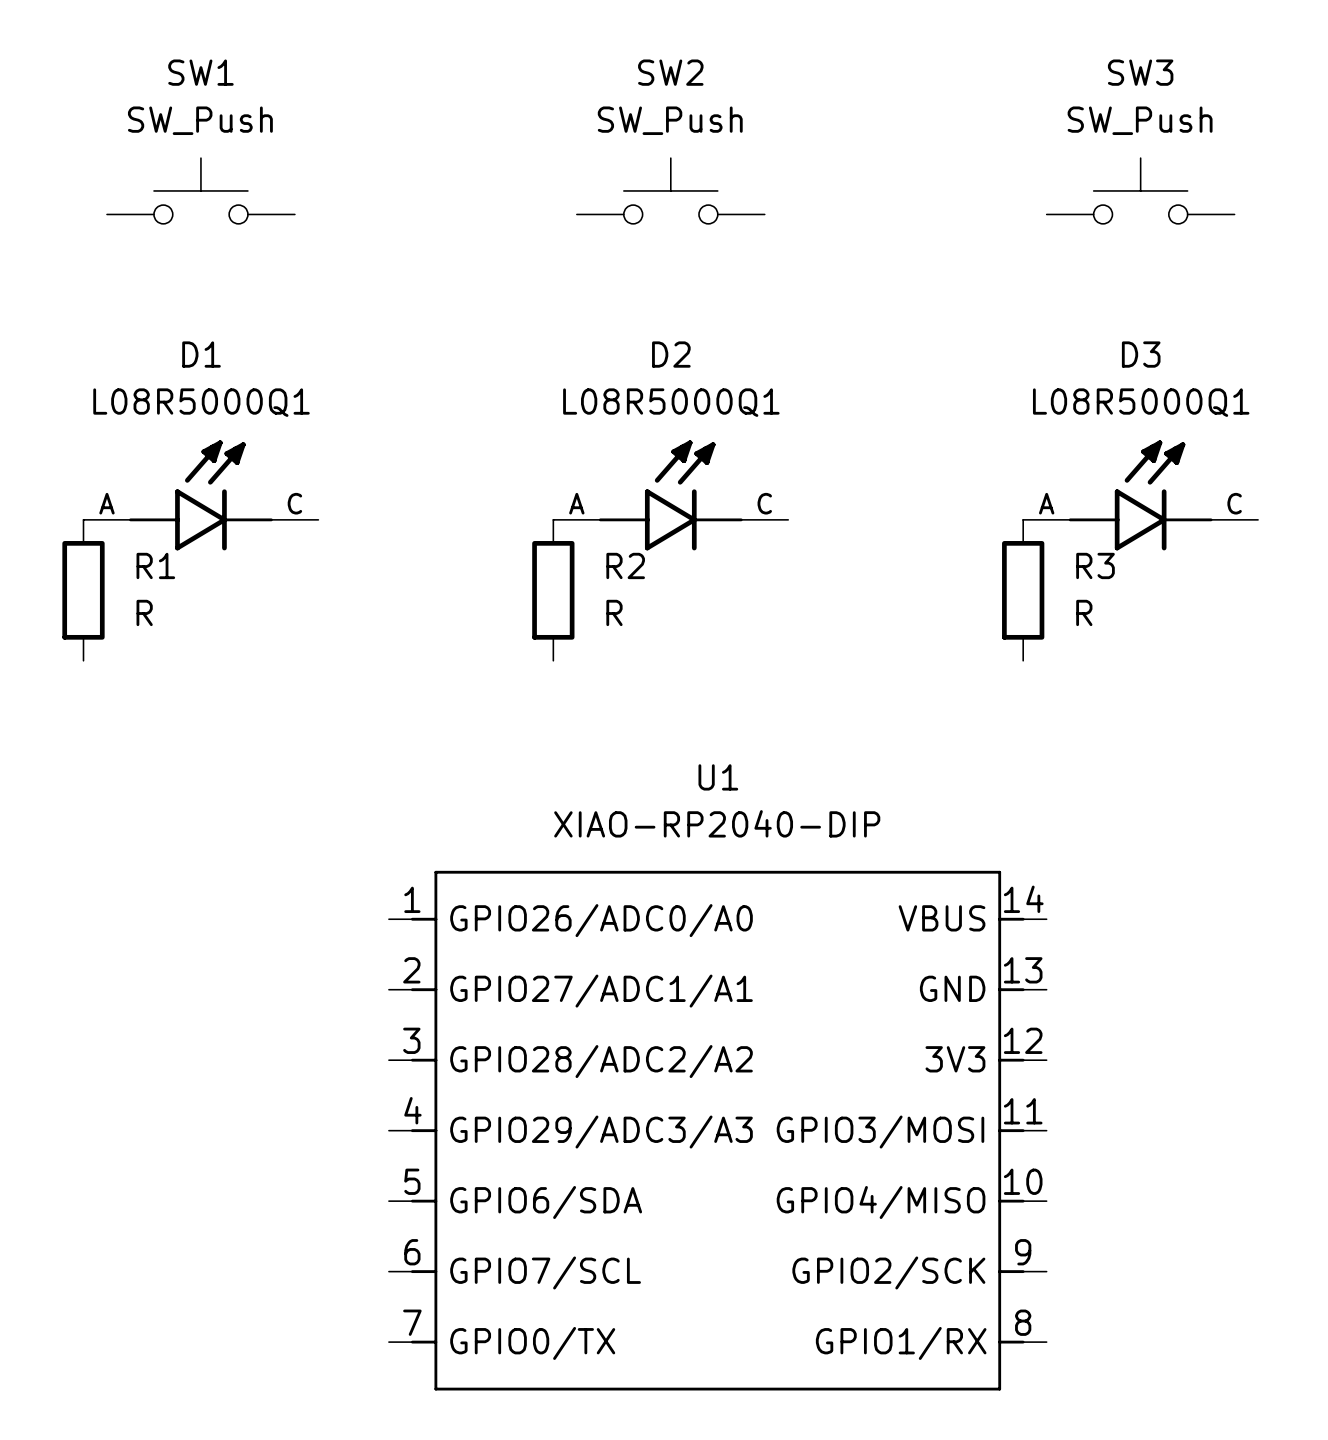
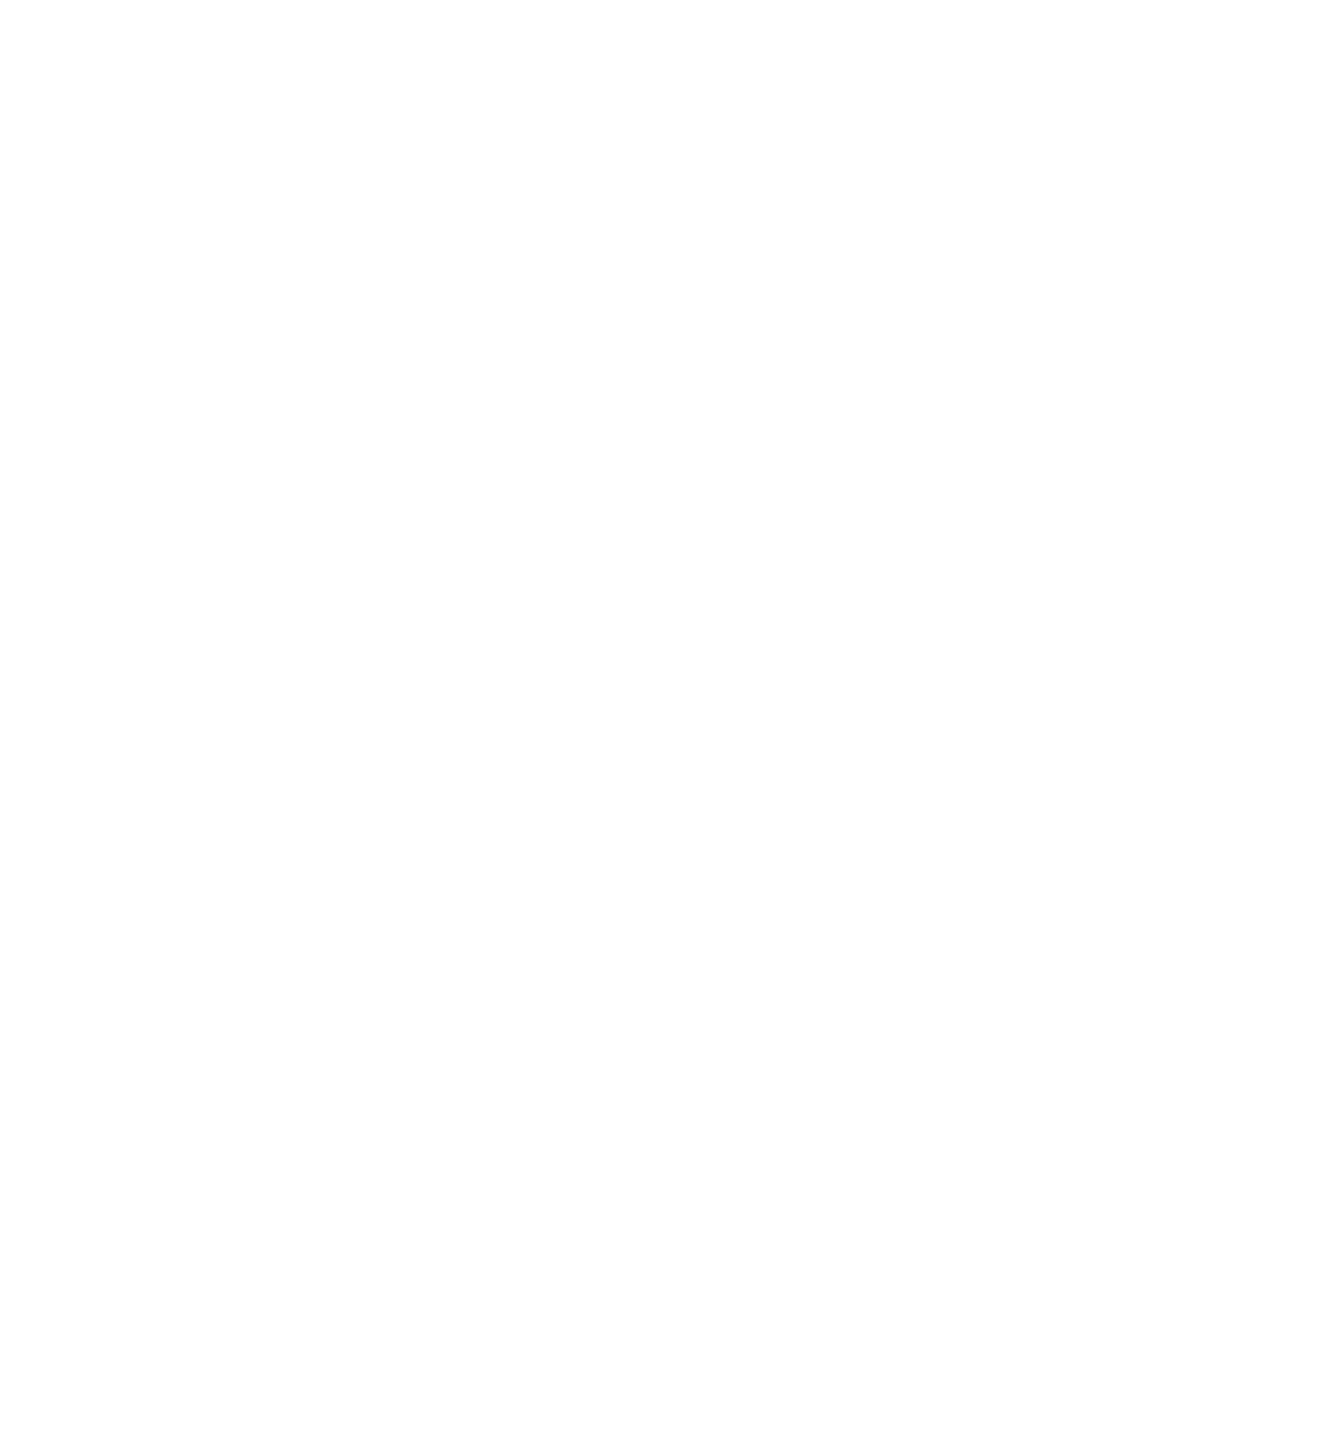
SW1: SW_Push (200, 190) -> none
SW2: SW_Push (670, 190) -> none
SW3: SW_Push (1140, 190) -> none
D1: L08R5000Q1 (200, 495) -> none
D2: L08R5000Q1 (670, 495) -> none
D3: L08R5000Q1 (1140, 495) -> none
R1: R (83, 590) -> none
R2: R (553, 590) -> none
R3: R (1023, 590) -> none
U1: XIAO-RP2040-DIP (717, 1130) -> none

